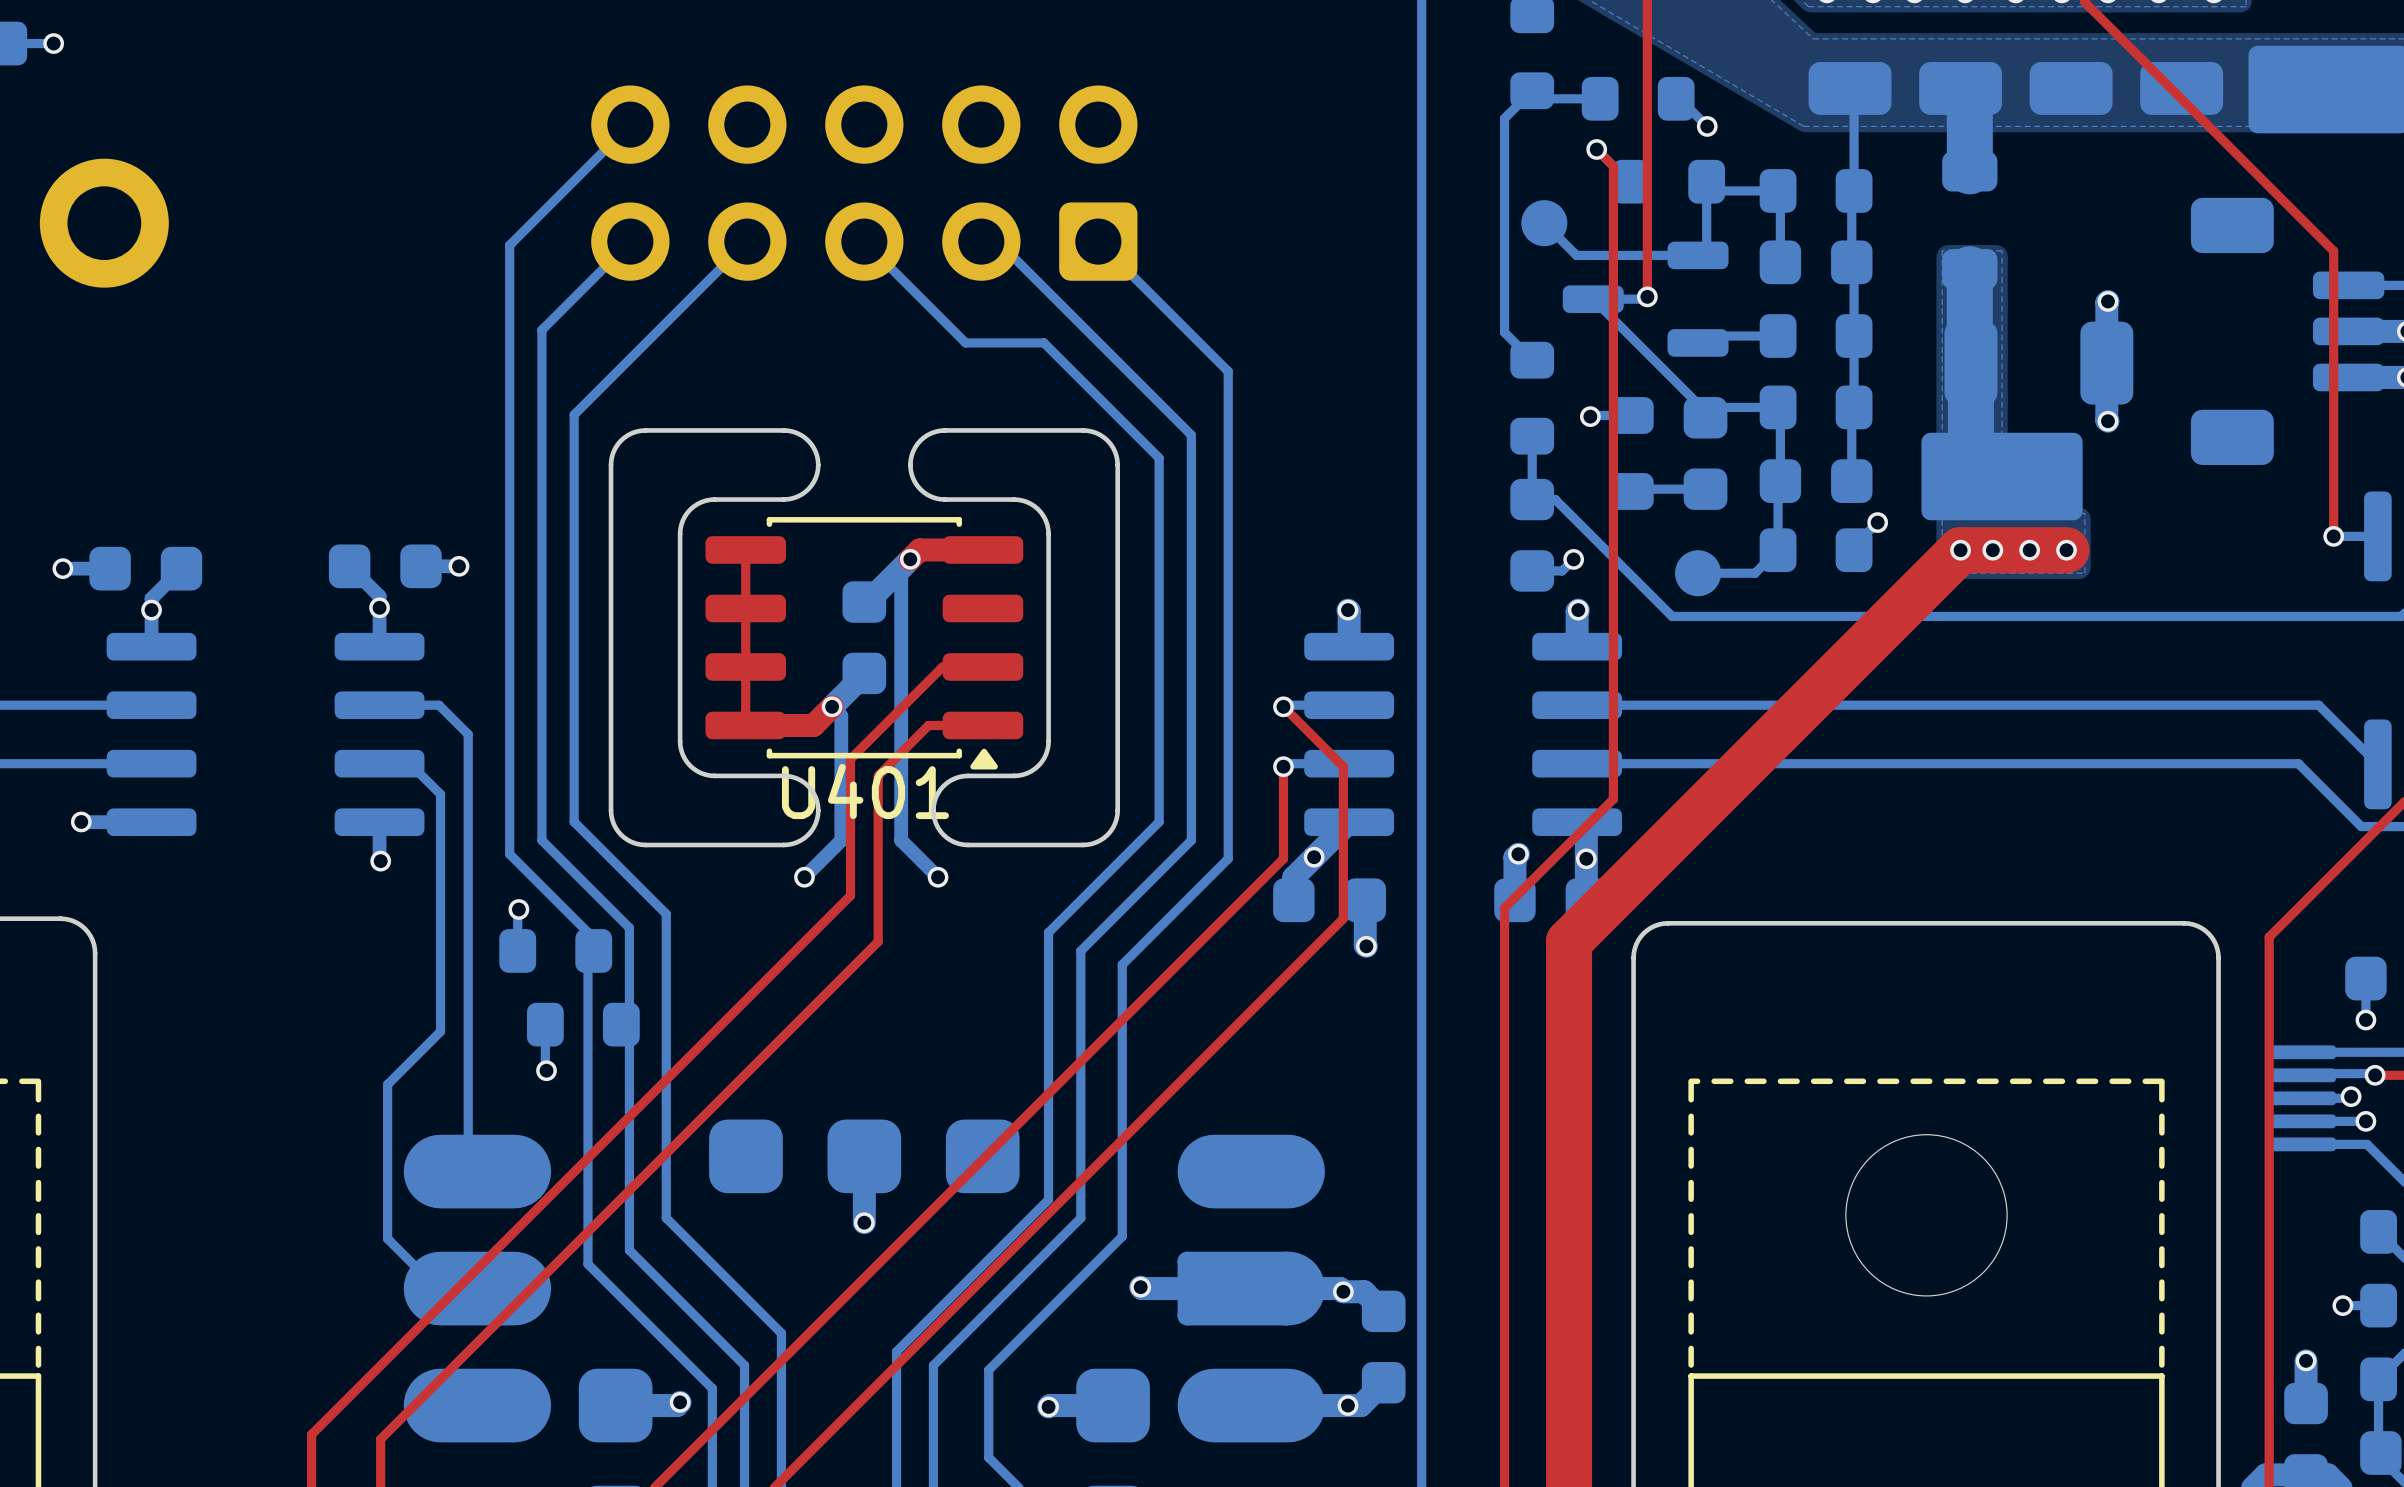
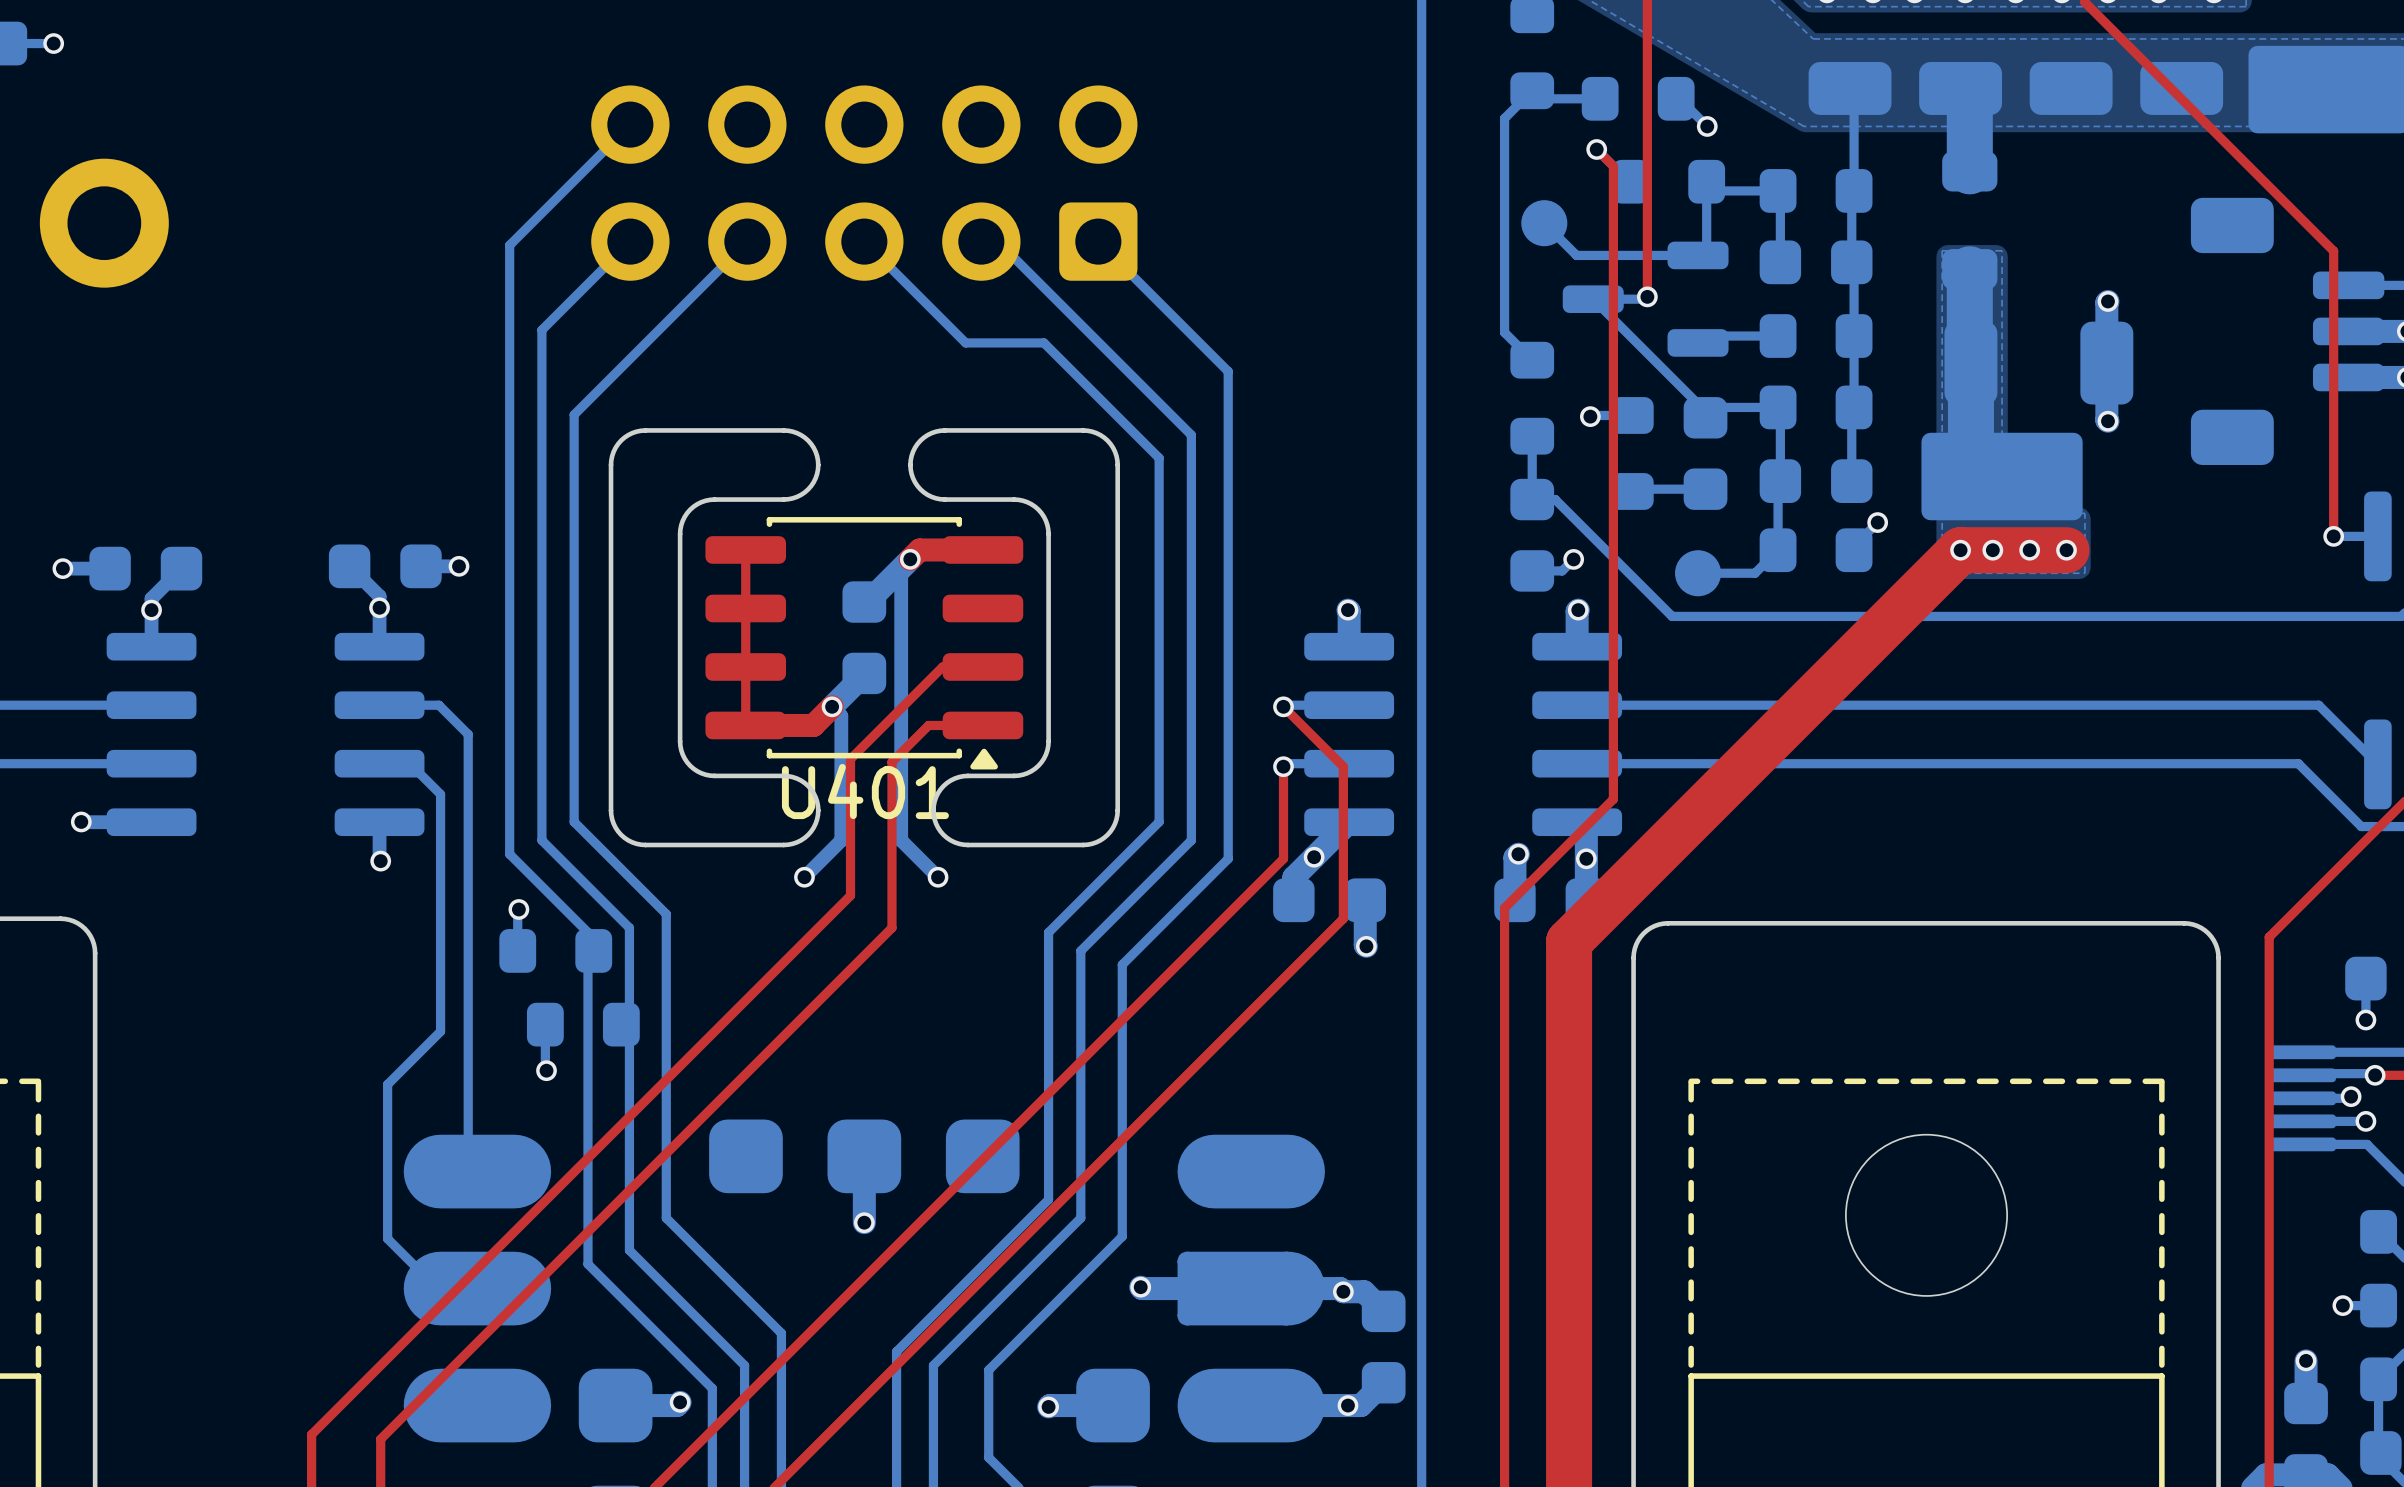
top track: (891, 762) (878, 775) (878, 941) -> (891, 762) (891, 927) (878, 941)

